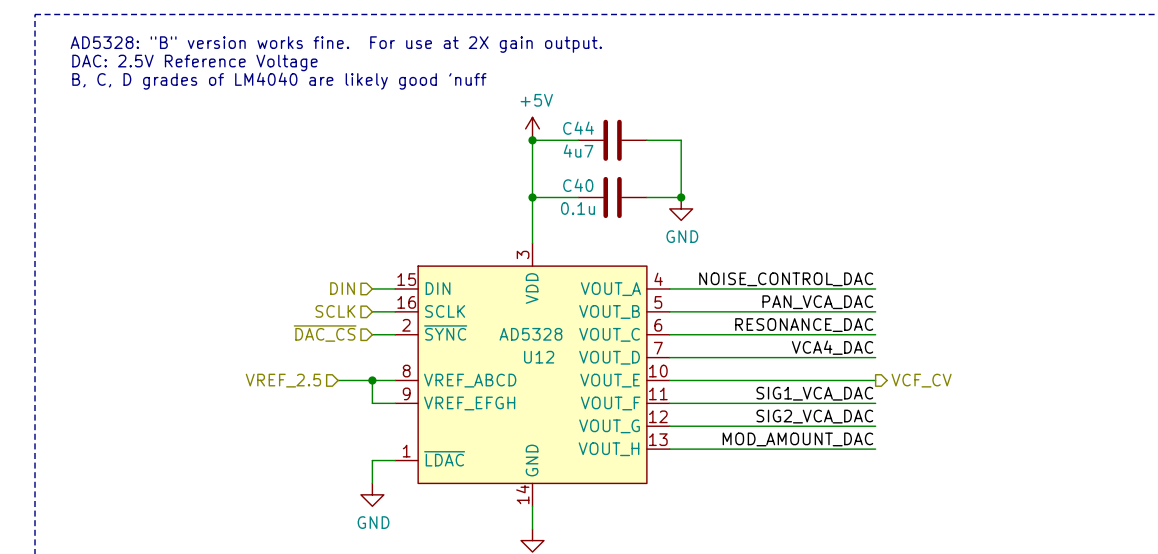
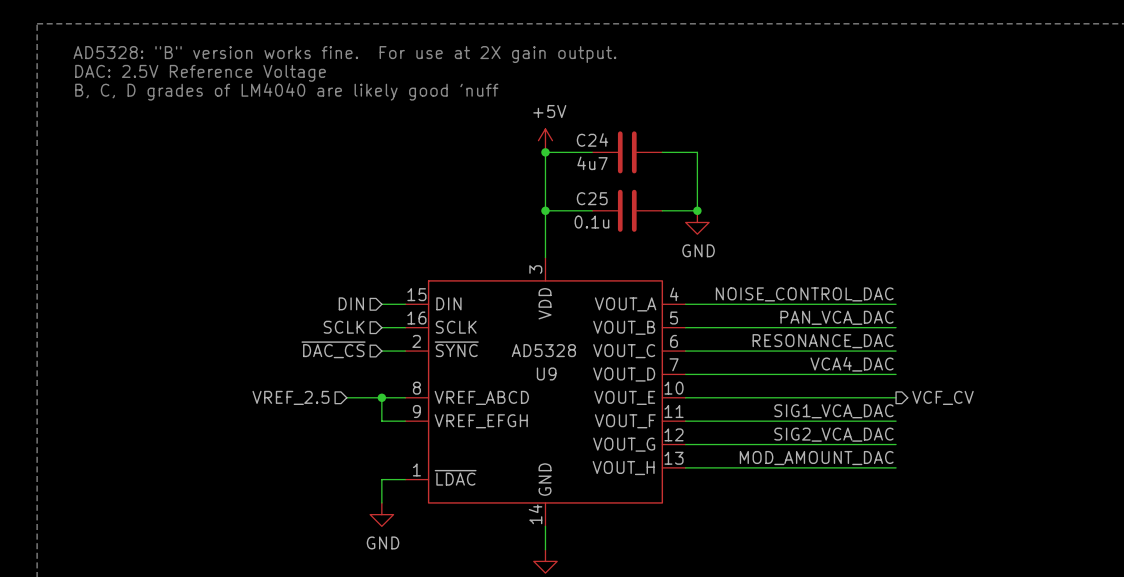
C44 name: C44 (578, 128) -> C24 (592, 139)
C40 name: C40 (578, 185) -> C25 (592, 198)
U12 name: U12 (539, 357) -> U9 (546, 373)

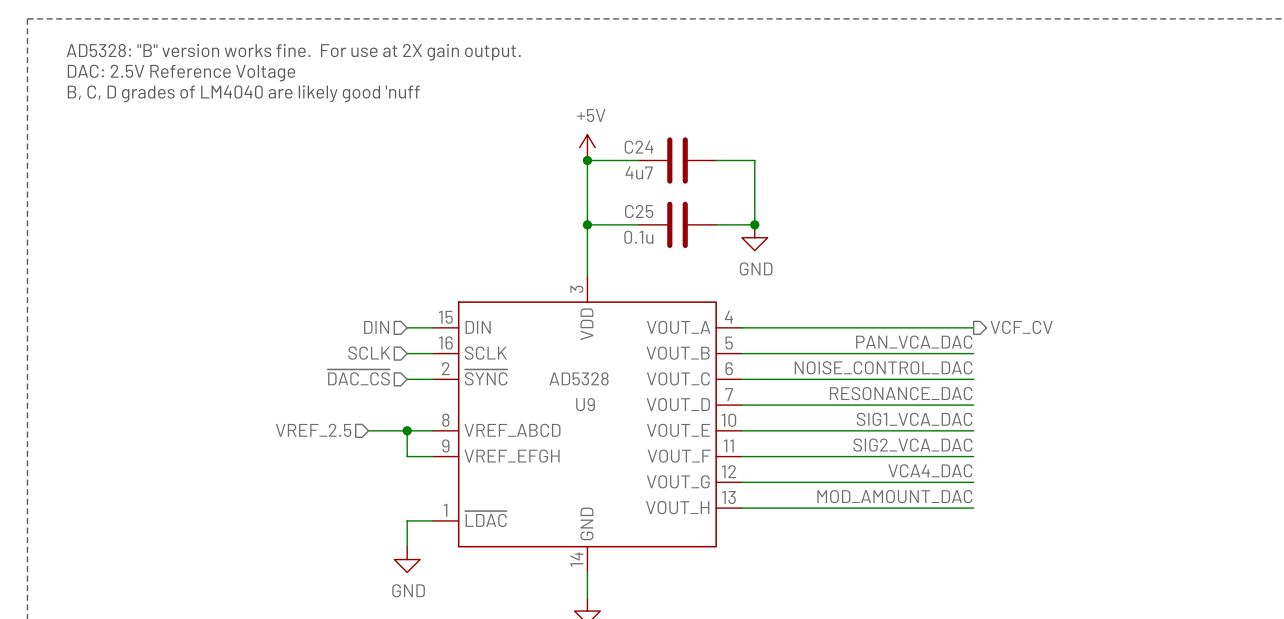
label: NOISE_CONTROL_DAC (804, 294) -> none
label: RESONANCE_DAC (823, 341) -> NOISE_CONTROL_DAC (883, 367)
label: VCA4_DAC (852, 364) -> RESONANCE_DAC (901, 393)
label: none -> SIG1_VCA_DAC (914, 419)
hierarchical label position: VCF_CV (942, 397) -> VCF_CV (1021, 327)
label: SIG1_VCA_DAC (833, 411) -> SIG2_VCA_DAC (912, 445)
label: SIG2_VCA_DAC (833, 434) -> VCA4_DAC (930, 470)

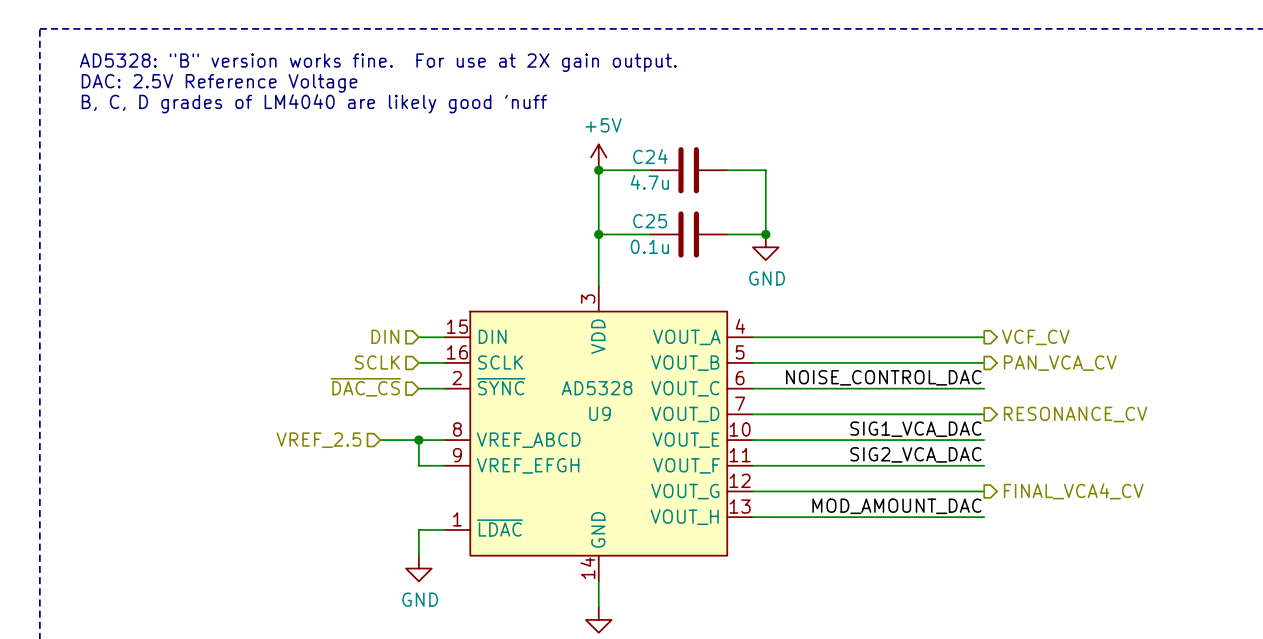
C24 value: 4u7 (639, 172) -> 4.7u (649, 182)
label: PAN_VCA_DAC (914, 342) -> none
hierarchical label: none -> PAN_VCA_CV (1060, 363)
label: RESONANCE_DAC (901, 393) -> none
hierarchical label: none -> RESONANCE_CV (1075, 414)
label: VCA4_DAC (930, 470) -> none
hierarchical label: none -> FINAL_VCA4_CV (1073, 491)

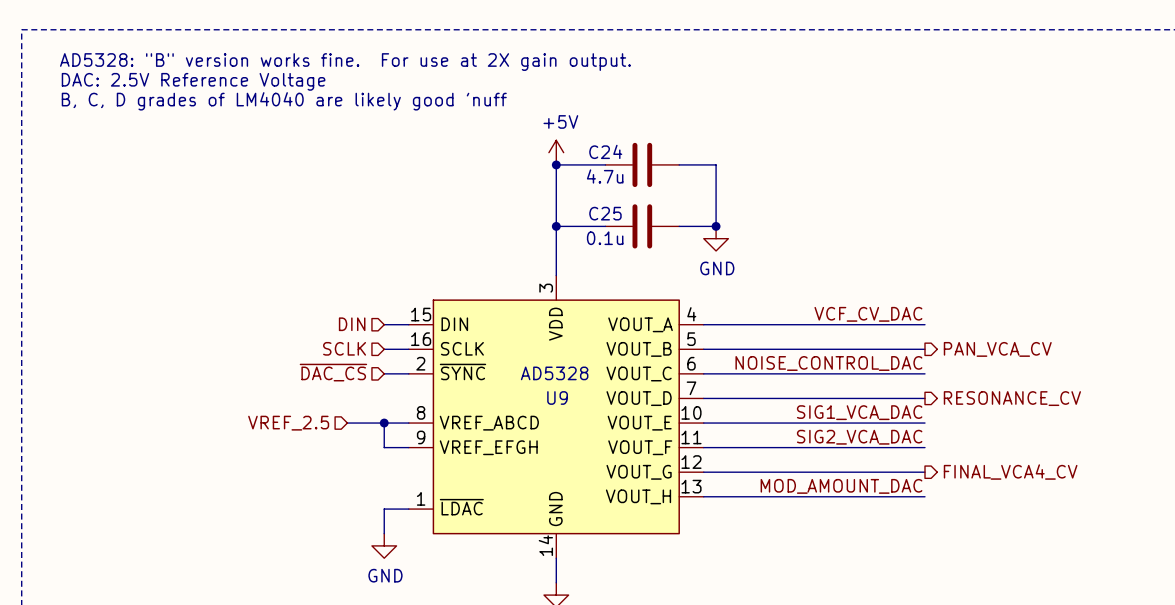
label: none -> VCF_CV_DAC (868, 314)
hierarchical label: VCF_CV (1035, 337) -> none

